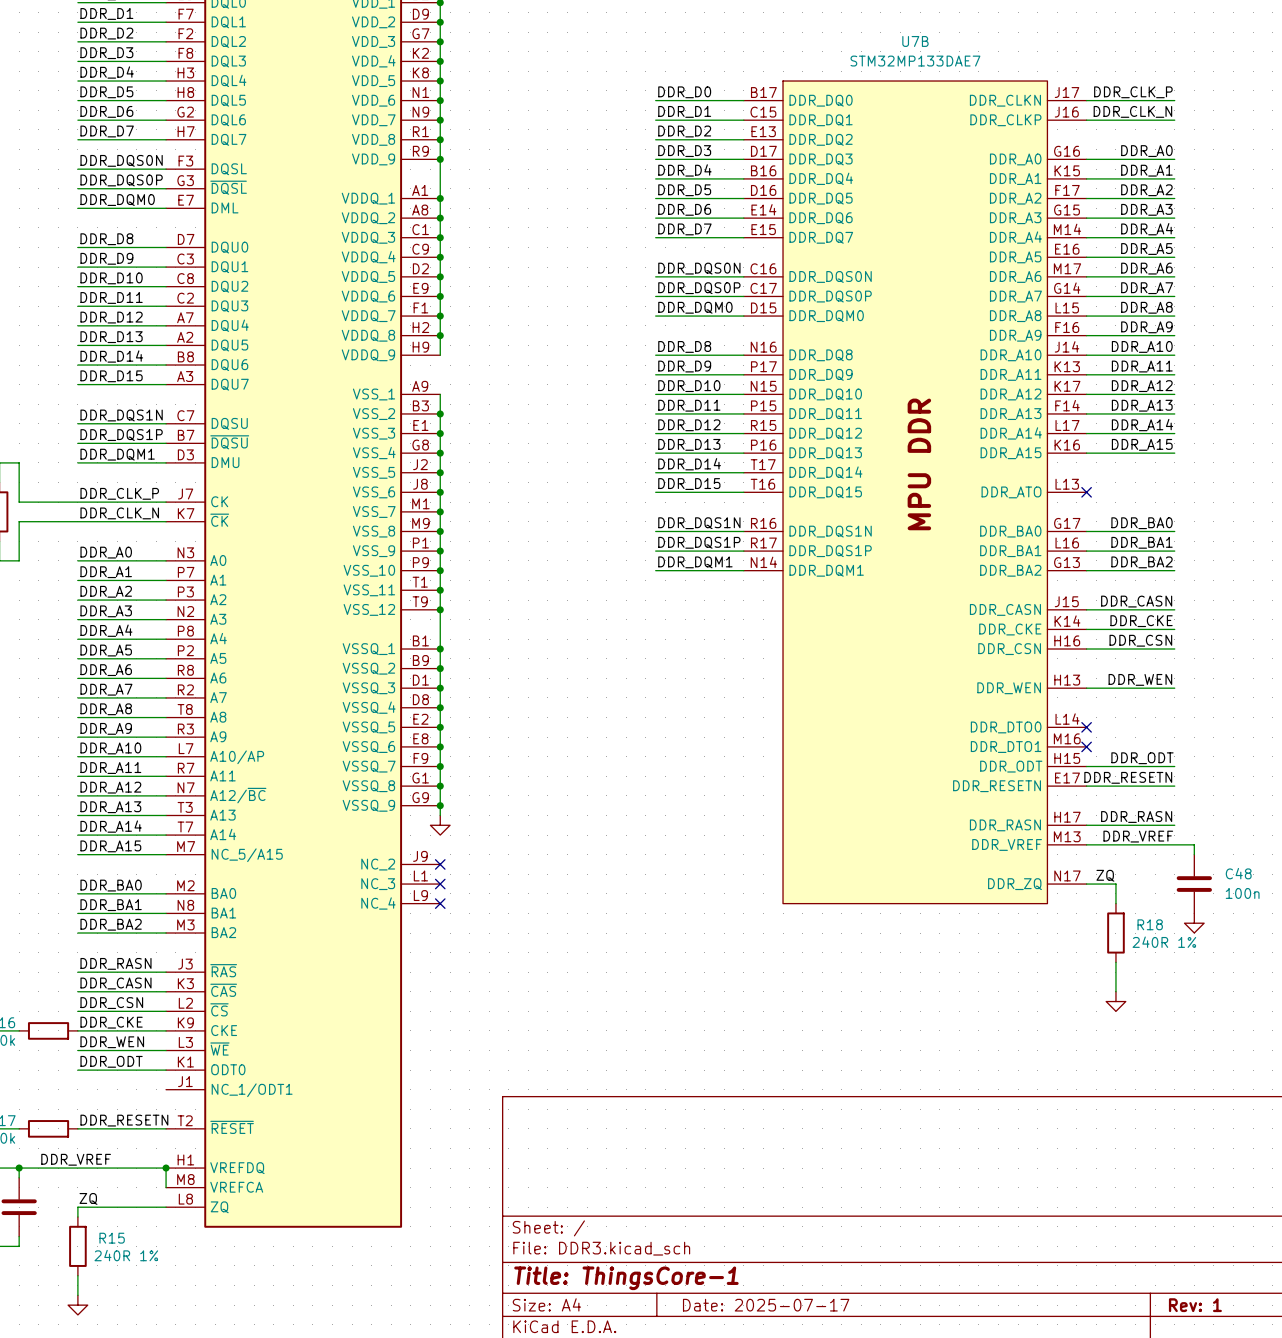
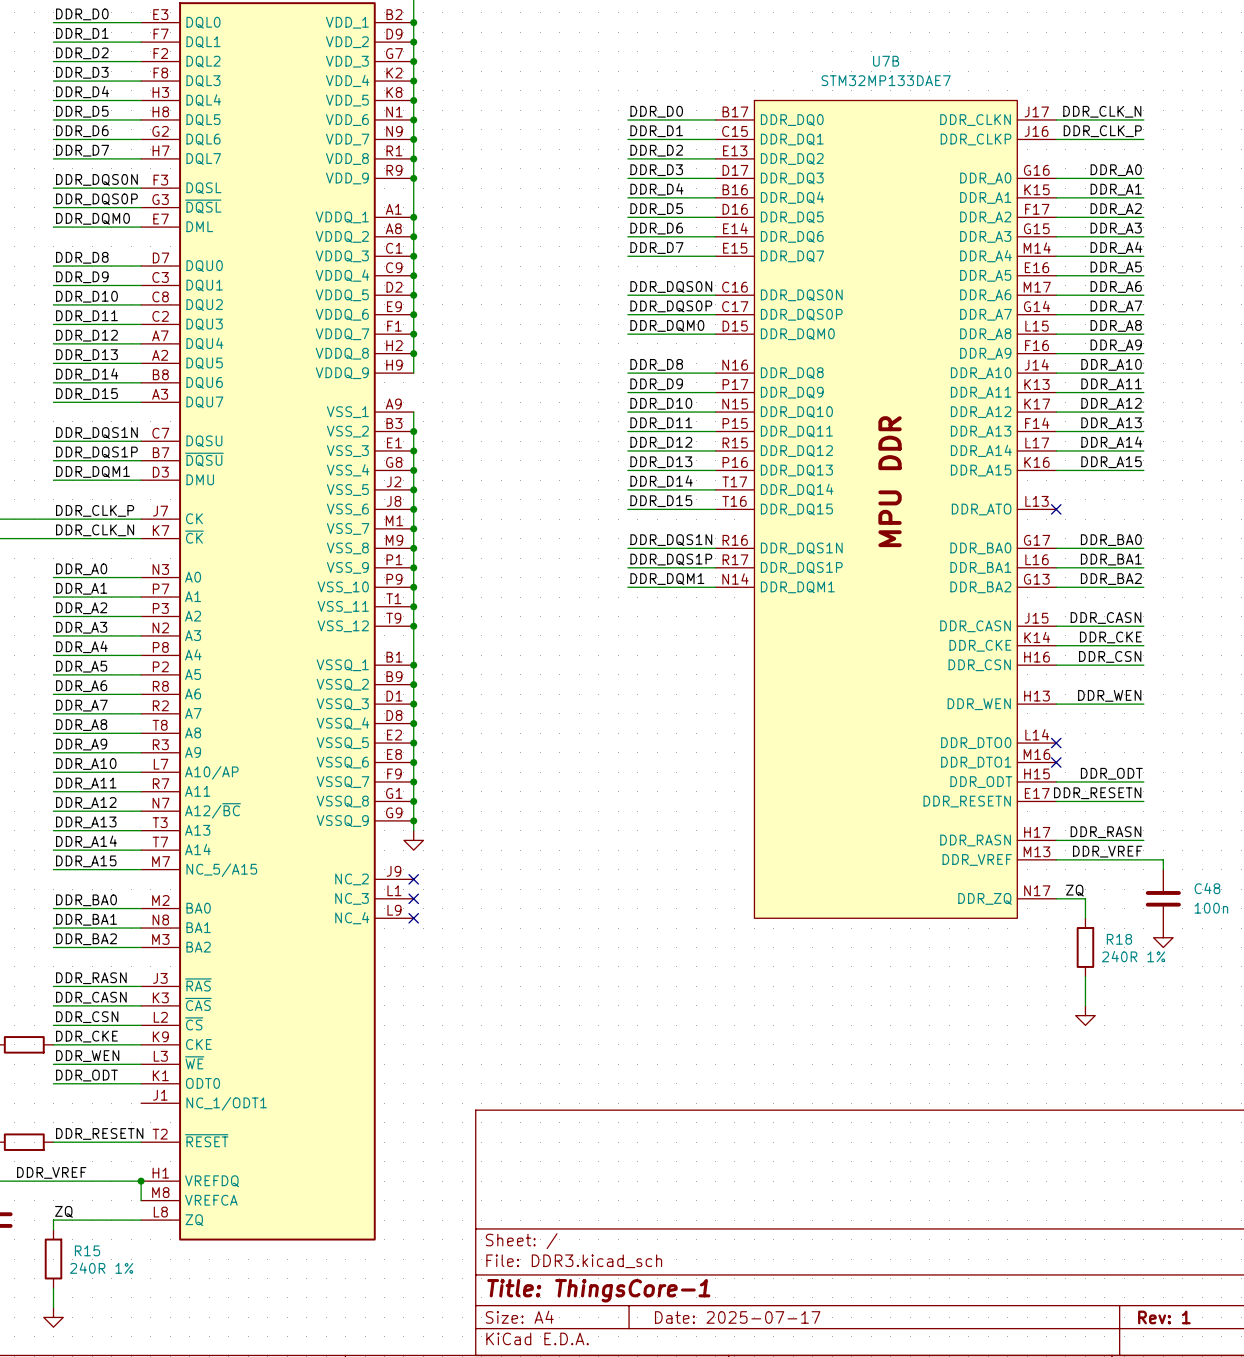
label: DDR_CLK_P (1133, 92) -> DDR_CLK_N (1102, 111)
label: DDR_CLK_N (1132, 111) -> DDR_CLK_P (1102, 131)

